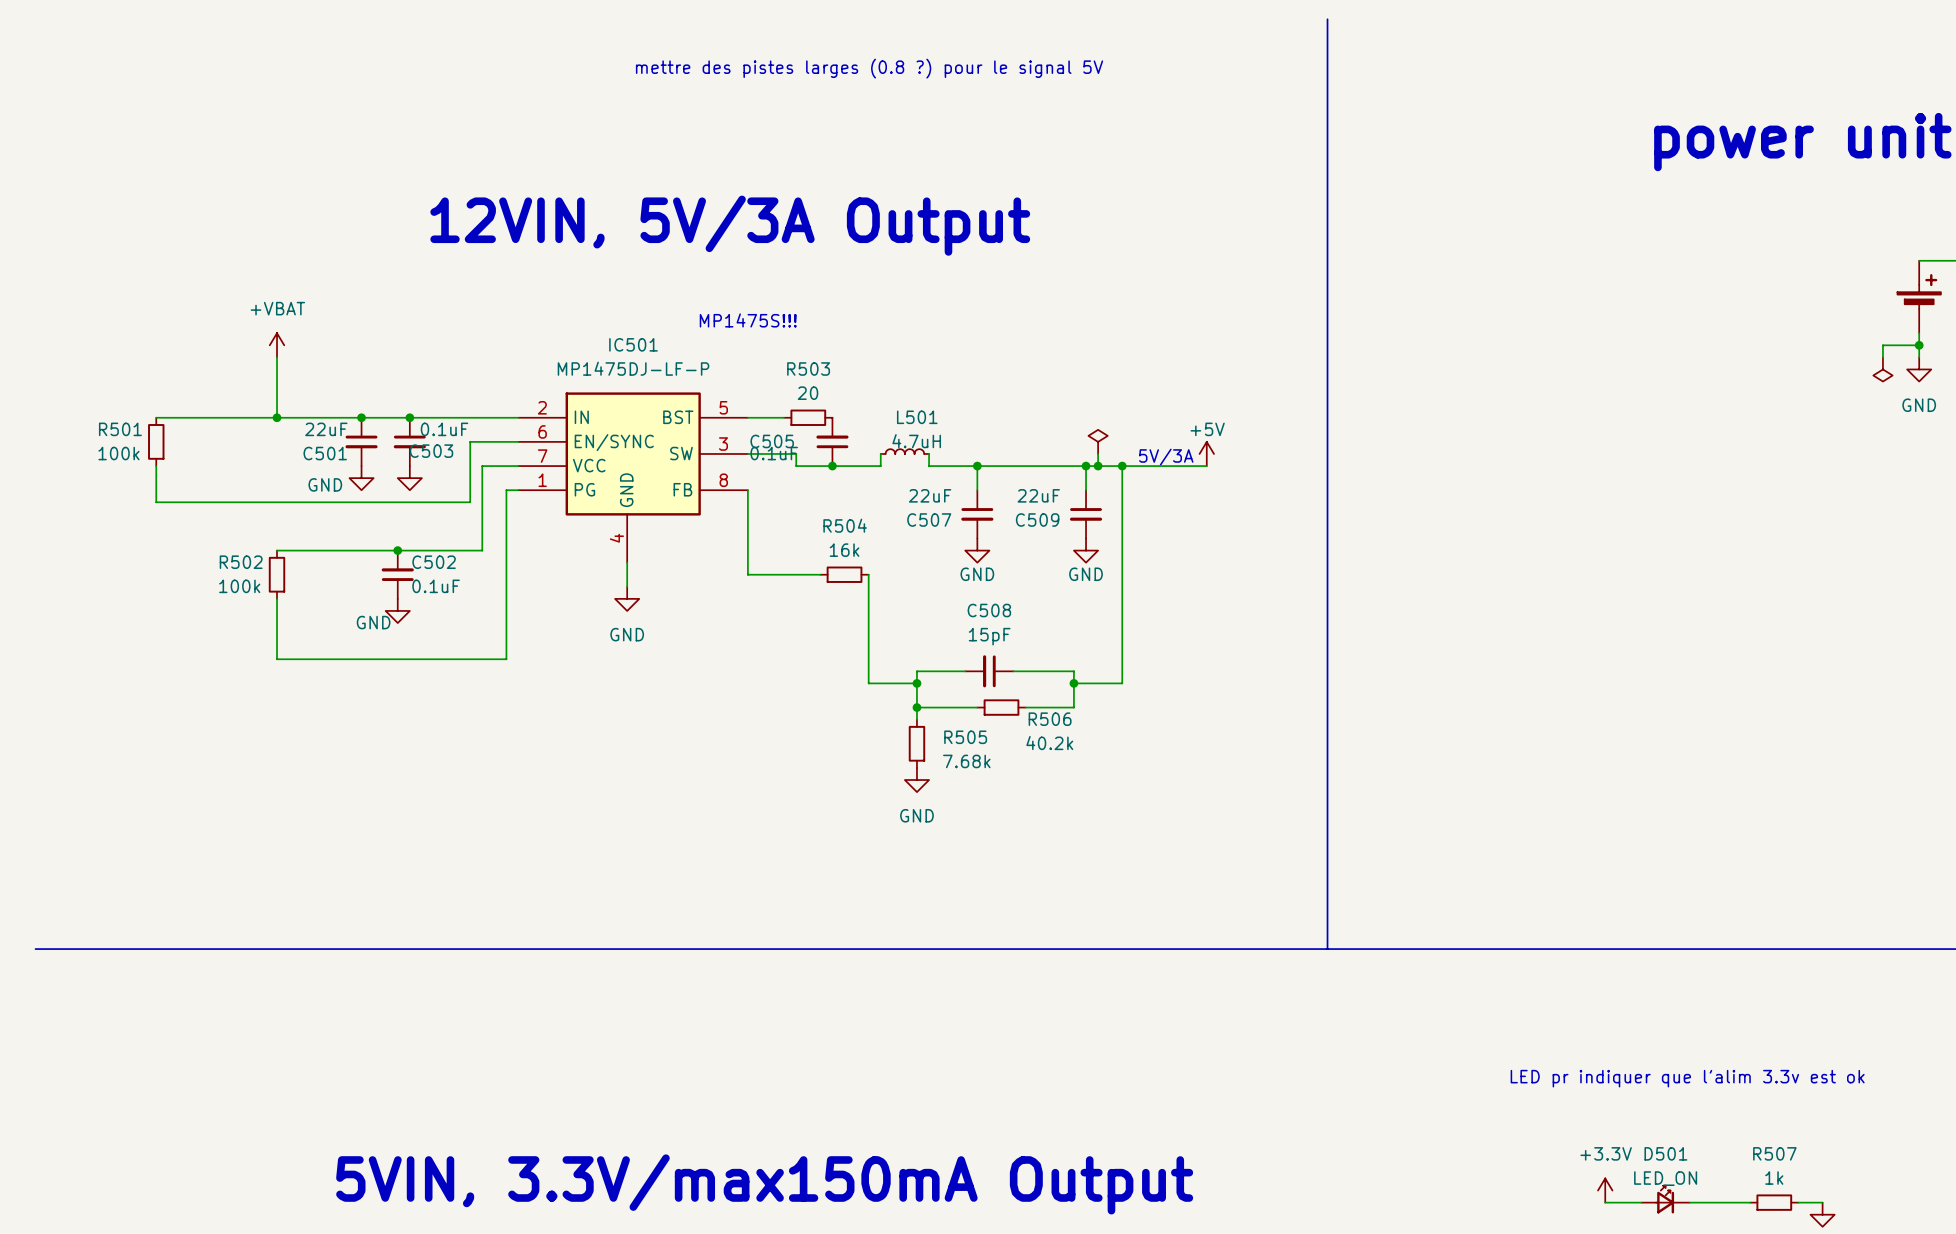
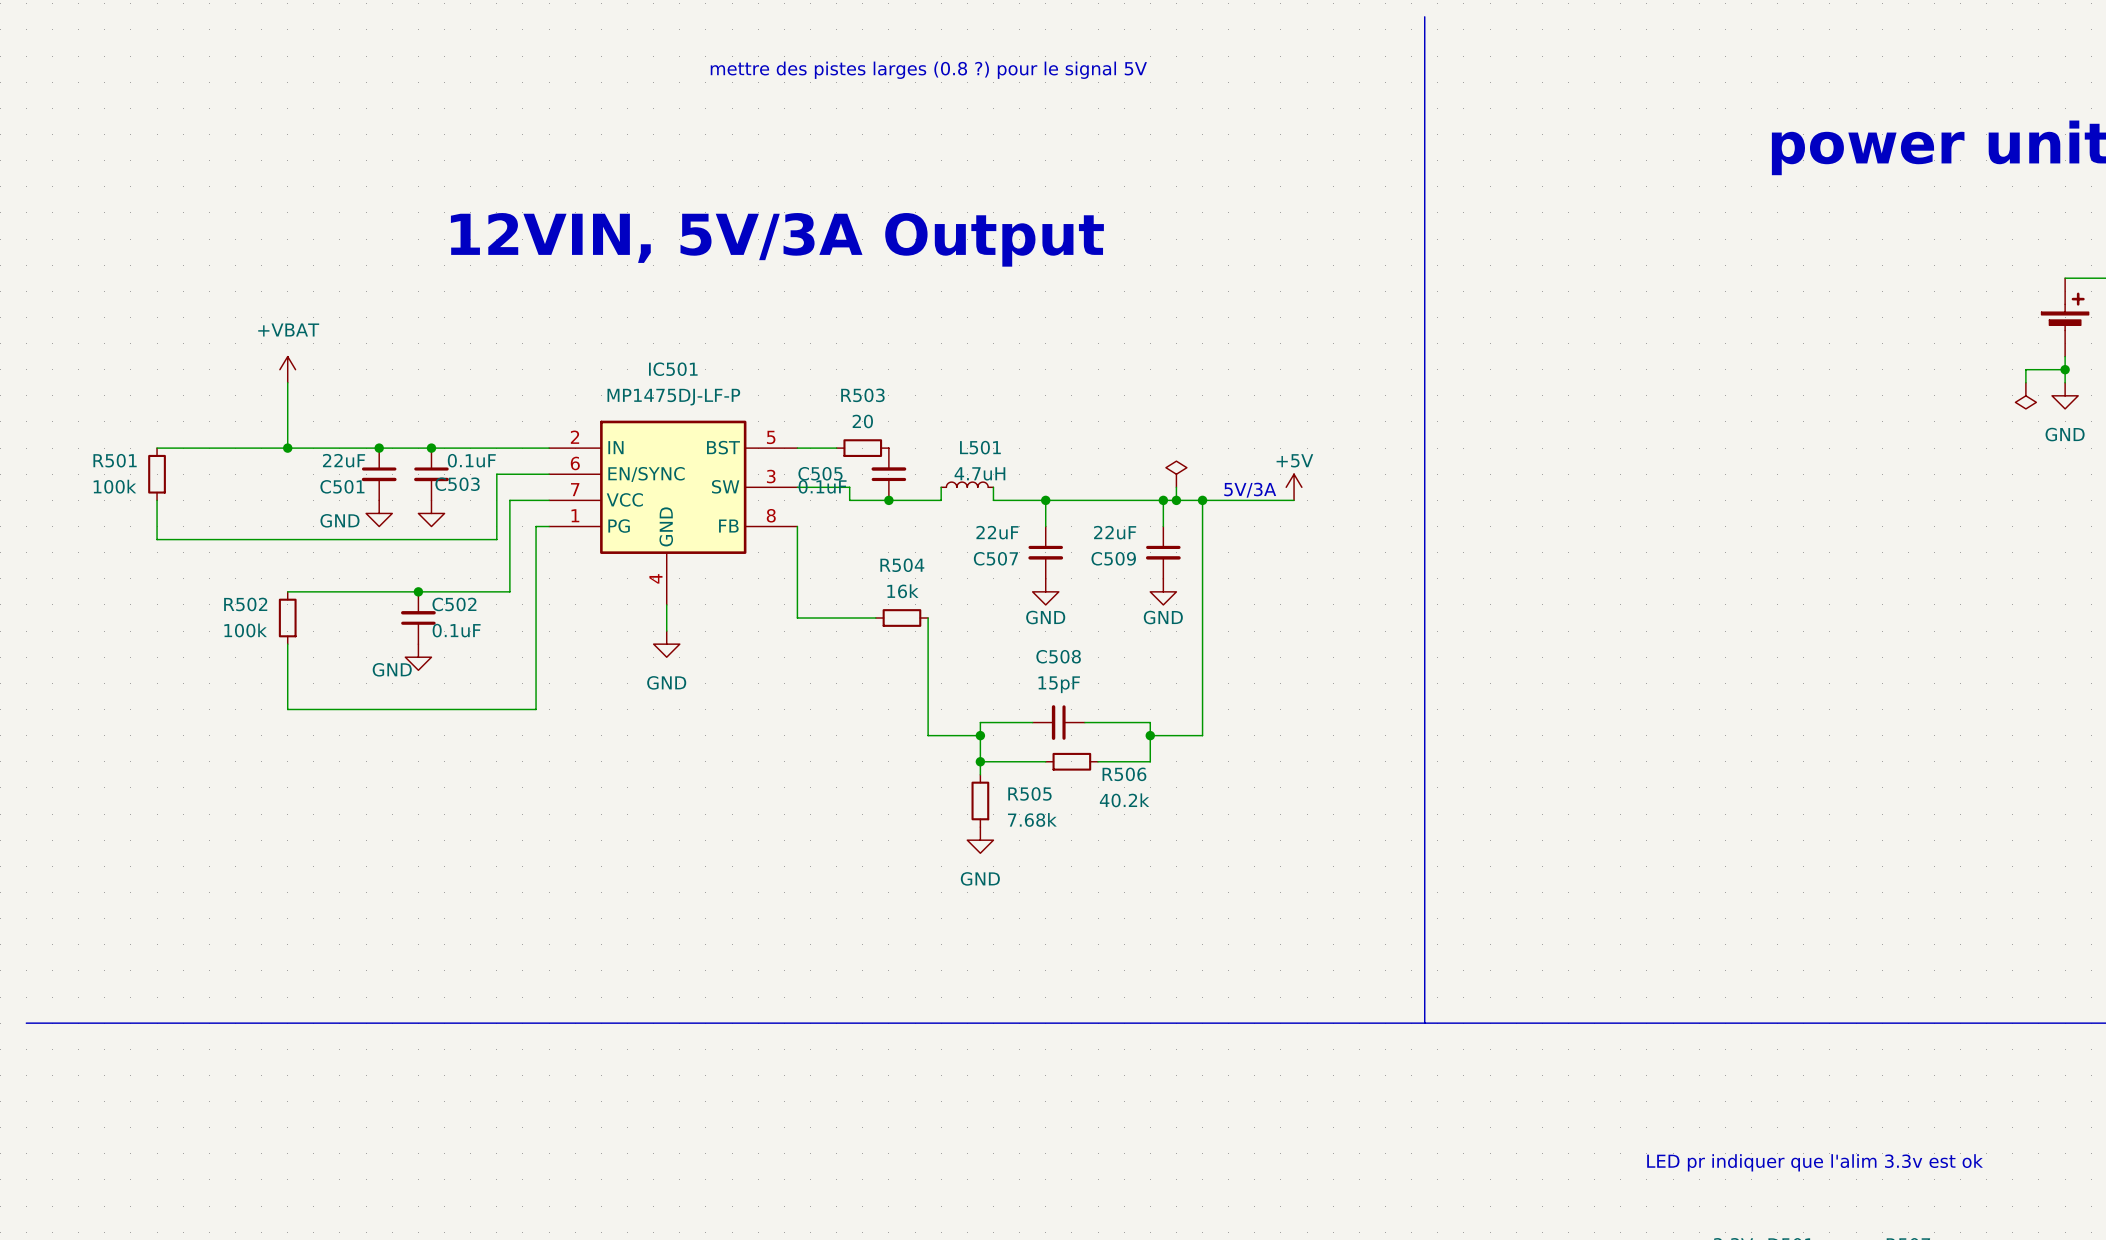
text: MP1475S!!! (748, 320) -> none

